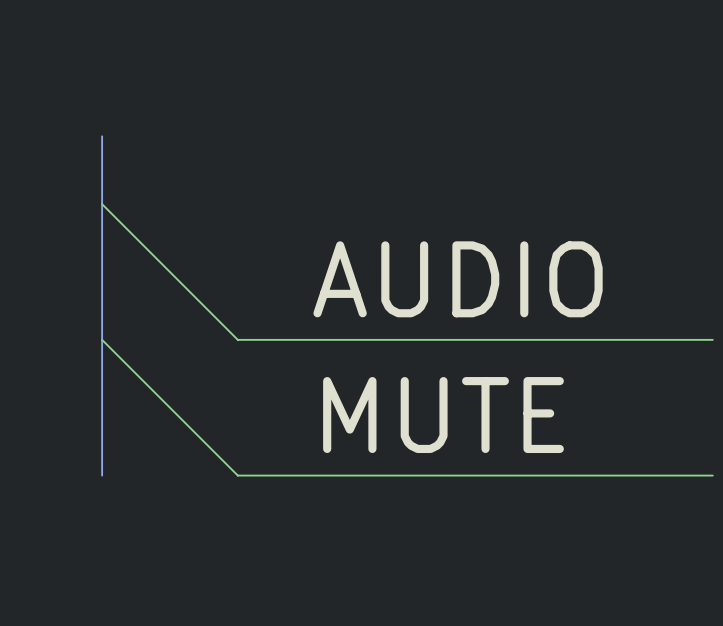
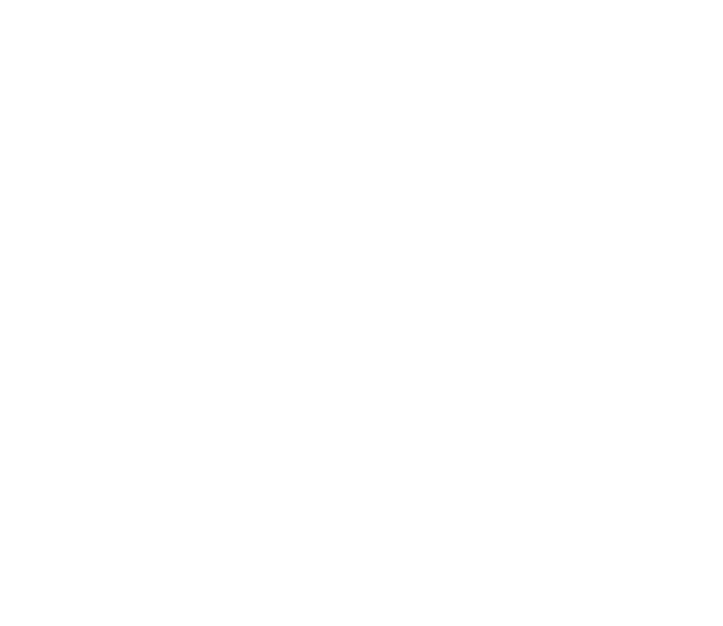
bus: (102, 136) (102, 475) -> none
wire: (102, 204) (237, 339) (712, 339) -> none
label: AUDIO (458, 279) -> none
wire: (102, 339) (237, 475) (712, 475) -> none
label: MUTE (443, 415) -> none

